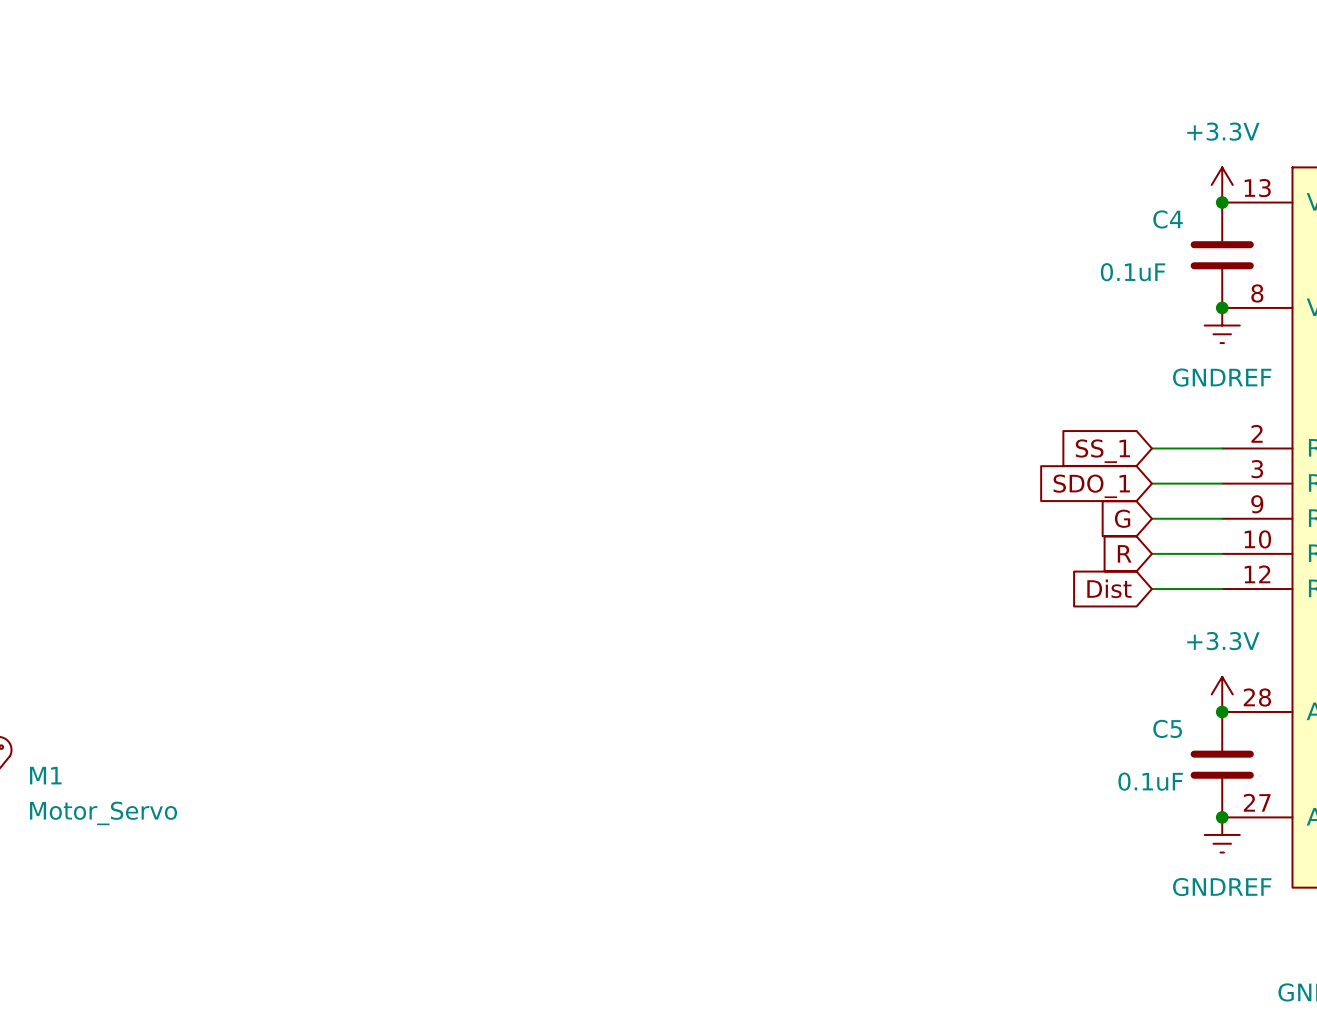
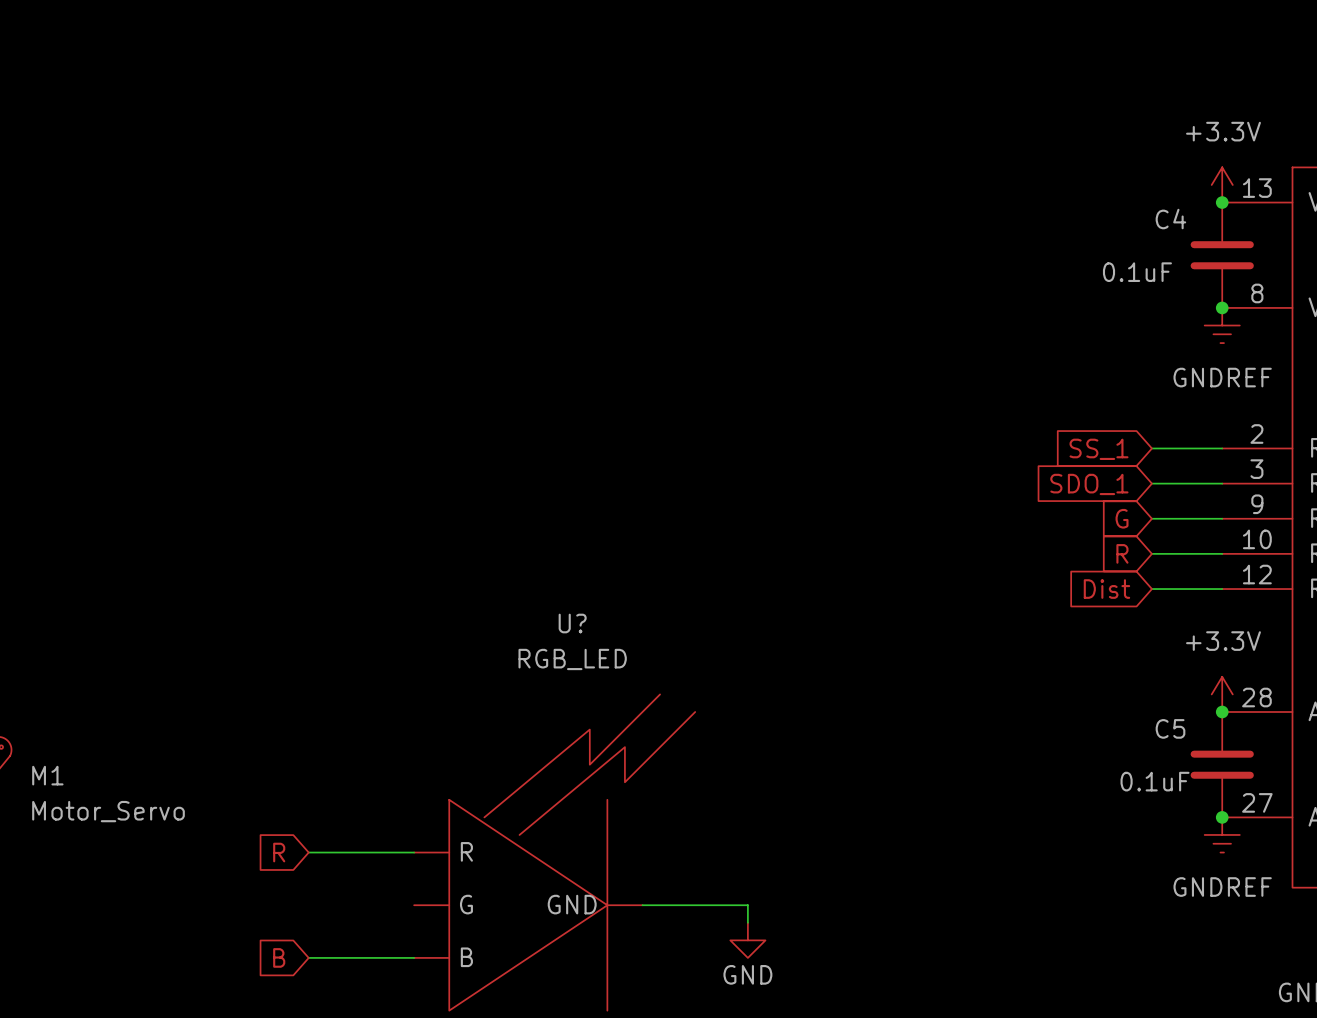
global label: none -> R (279, 852)
wire: none -> (308, 852) (414, 852)
U?: none -> RGB_LED (554, 852)
wire: none -> (642, 905) (747, 905) (747, 922)
power symbol: none -> GND (747, 940)
global label: none -> B (279, 957)
wire: none -> (308, 957) (414, 957)

